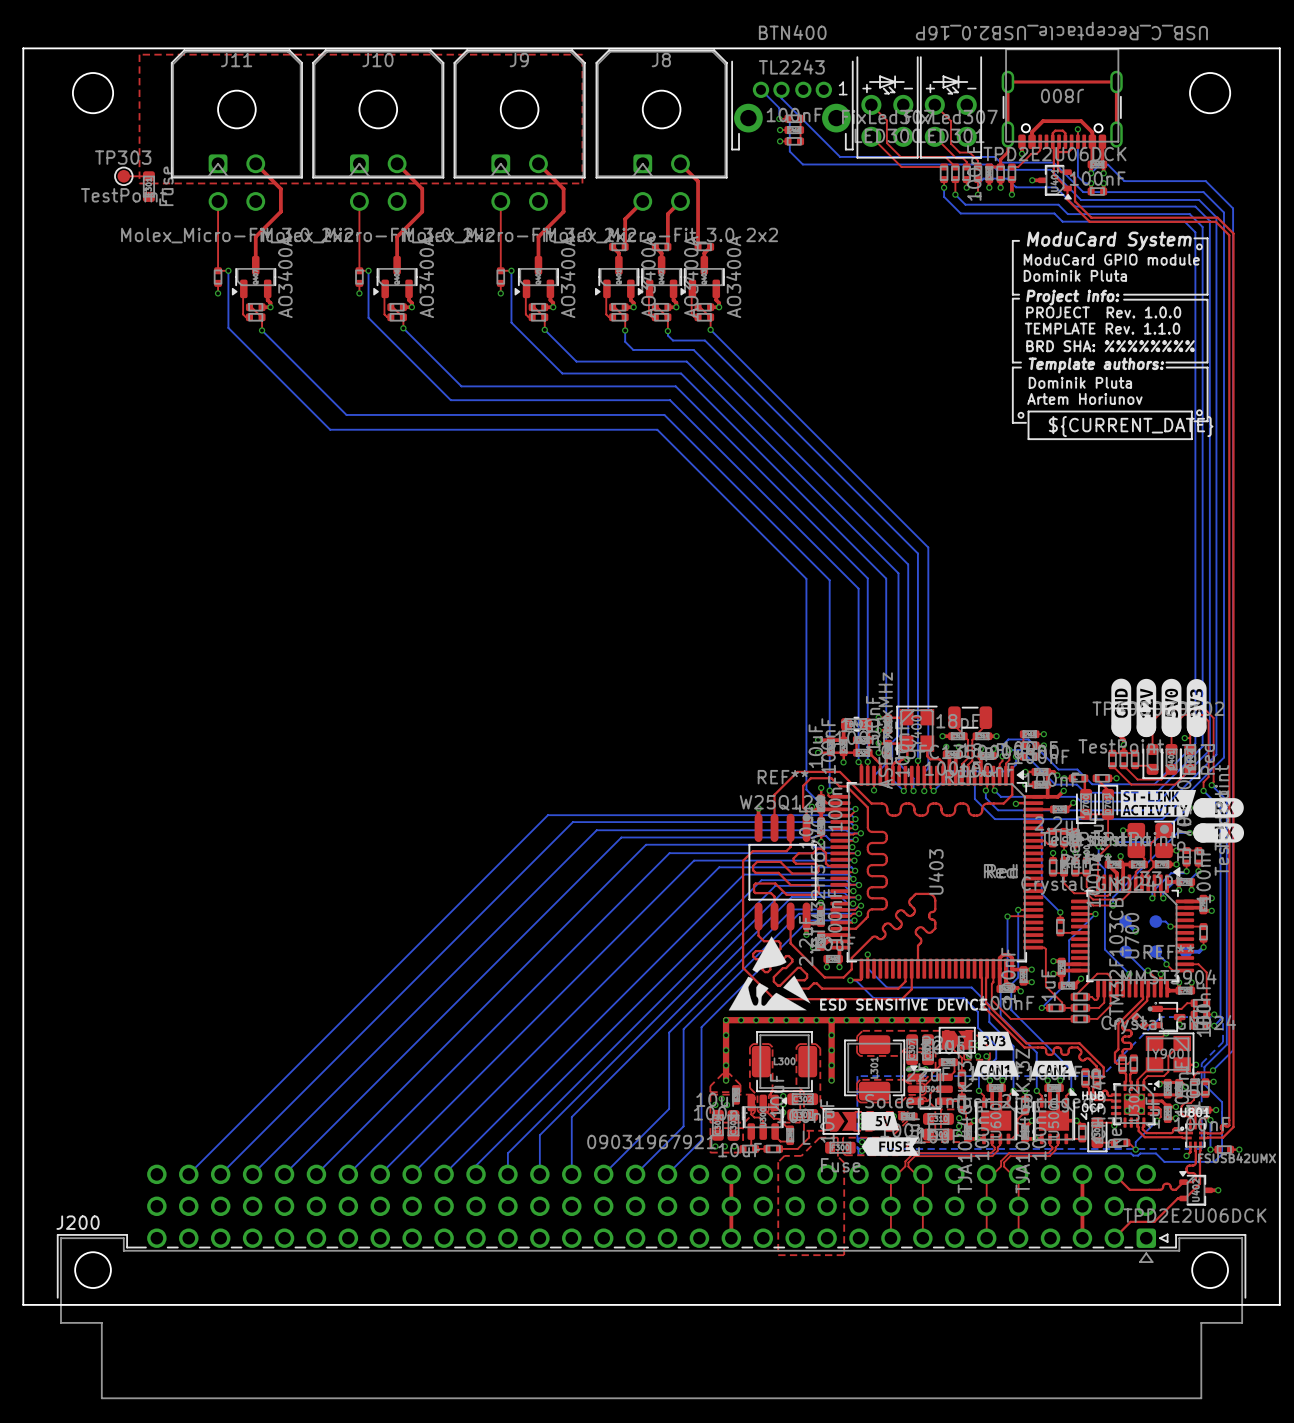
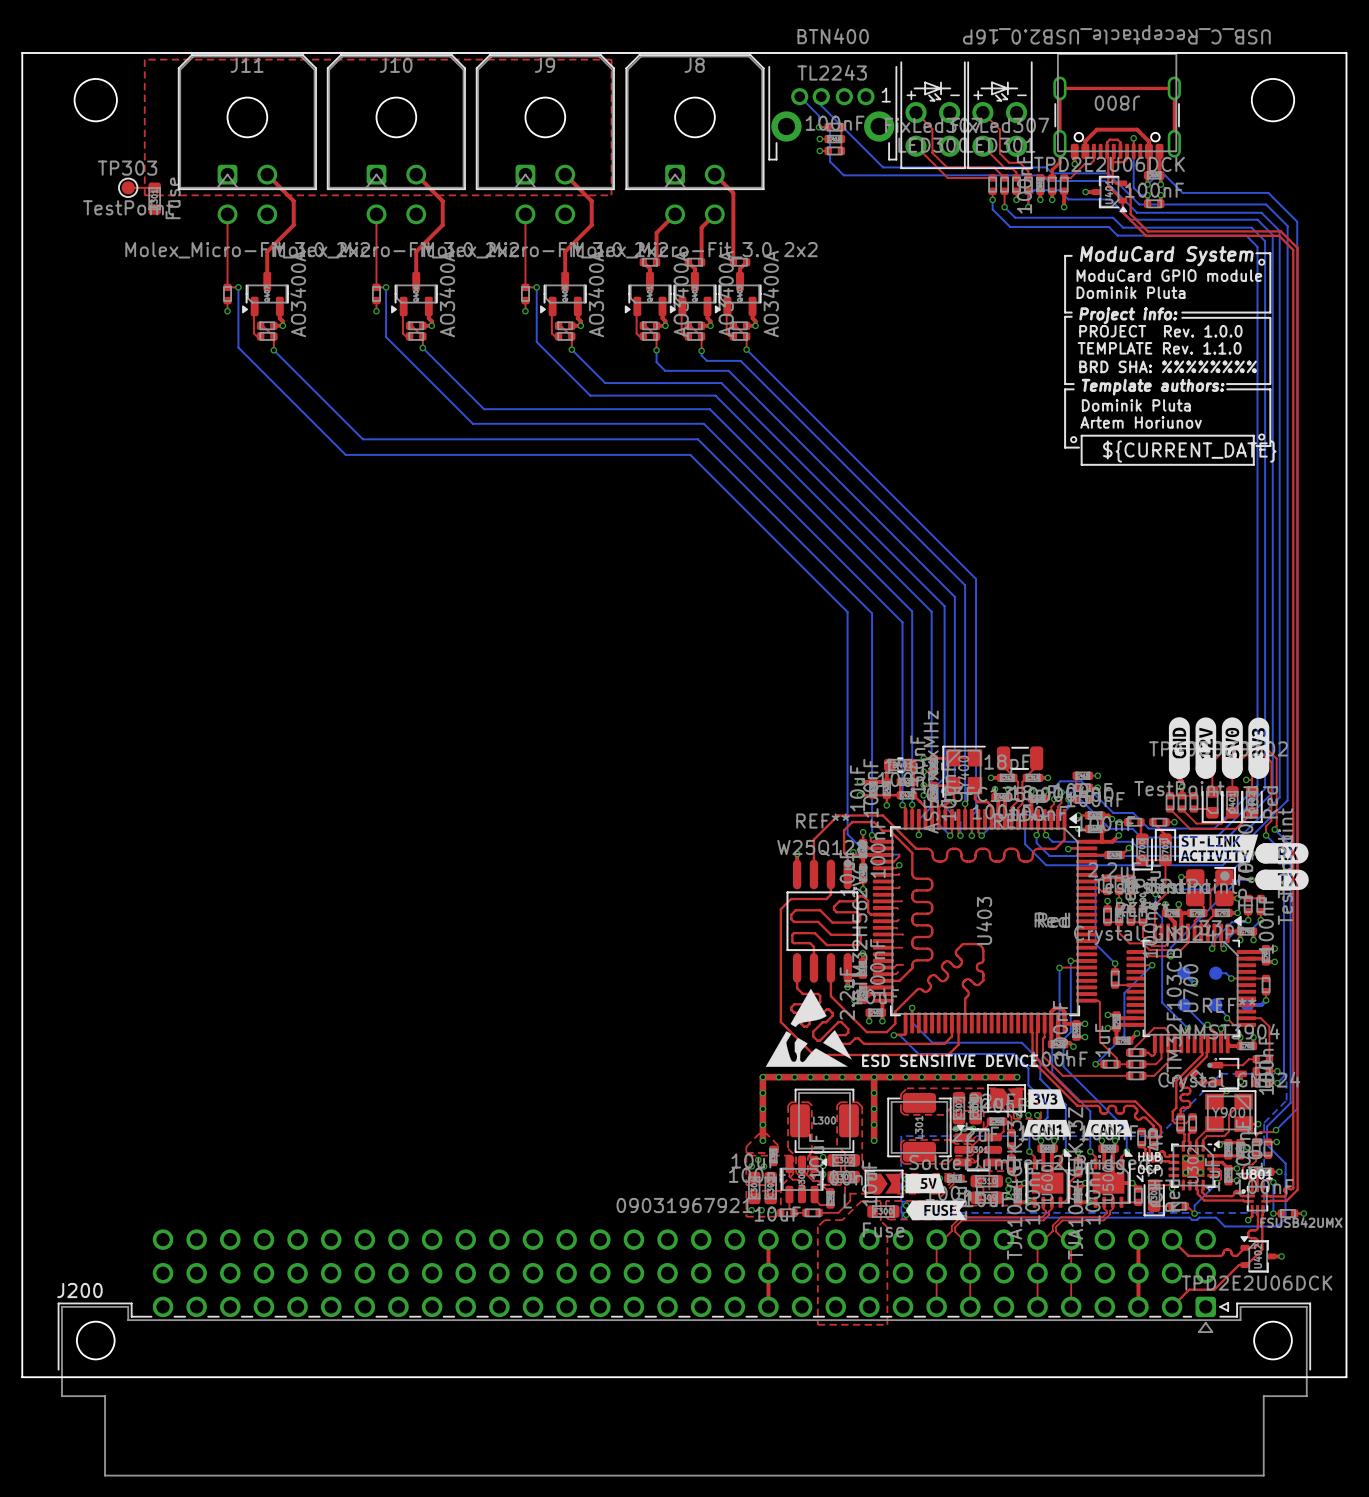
via: (855, 809) -> none
bottom track: (855, 819) (851, 815) (547, 815) (188, 1174) -> none
bottom track: (855, 827) (850, 822) (572, 822) (220, 1174) -> none
via: (855, 827) -> none
top track: (860, 833) (840, 834) -> none
bottom track: (860, 833) (849, 833) (846, 830) (596, 830) (252, 1174) -> none
via: (860, 833) -> none
bottom track: (855, 839) (829, 839) (825, 835) (621, 837) (284, 1174) -> none
via: (855, 839) -> none
bottom track: (852, 847) (815, 847) (812, 844) (646, 844) (316, 1174) -> none
via: (852, 847) -> none
bottom track: (857, 853) (669, 853) (348, 1174) -> none
via: (857, 853) -> none
bottom track: (854, 860) (694, 860) (380, 1174) -> none
via: (854, 860) -> none
bottom track: (855, 870) (851, 867) (719, 867) (412, 1174) -> none
via: (855, 870) -> none
bottom track: (853, 879) (848, 874) (743, 874) (444, 1174) -> none
via: (853, 879) -> none
bottom track: (859, 885) (857, 883) (851, 884) (846, 880) (761, 880) (476, 1165) (476, 1174) -> none
via: (859, 885) -> none
bottom track: (853, 891) (849, 891) (844, 885) (775, 885) (507, 1153) (507, 1174) -> none
via: (853, 891) -> none
bottom track: (858, 897) (849, 897) (844, 892) (782, 892) (539, 1135) (539, 1174) -> none
via: (858, 897) -> none
bottom track: (853, 903) (847, 903) (841, 897) (791, 897) (571, 1117) (571, 1174) -> none
via: (853, 903) -> none
top track: (860, 905) (854, 909) (840, 909) -> none
bottom track: (861, 905) (855, 909) (792, 909) (669, 1032) (669, 1108) (603, 1174) -> none
via: (861, 905) -> none
bottom track: (859, 913) (799, 913) (683, 1029) (683, 1126) (635, 1174) -> none
via: (859, 913) -> none
bottom track: (854, 920) (808, 920) (701, 1027) (701, 1140) (667, 1174) -> none
via: (854, 920) -> none

